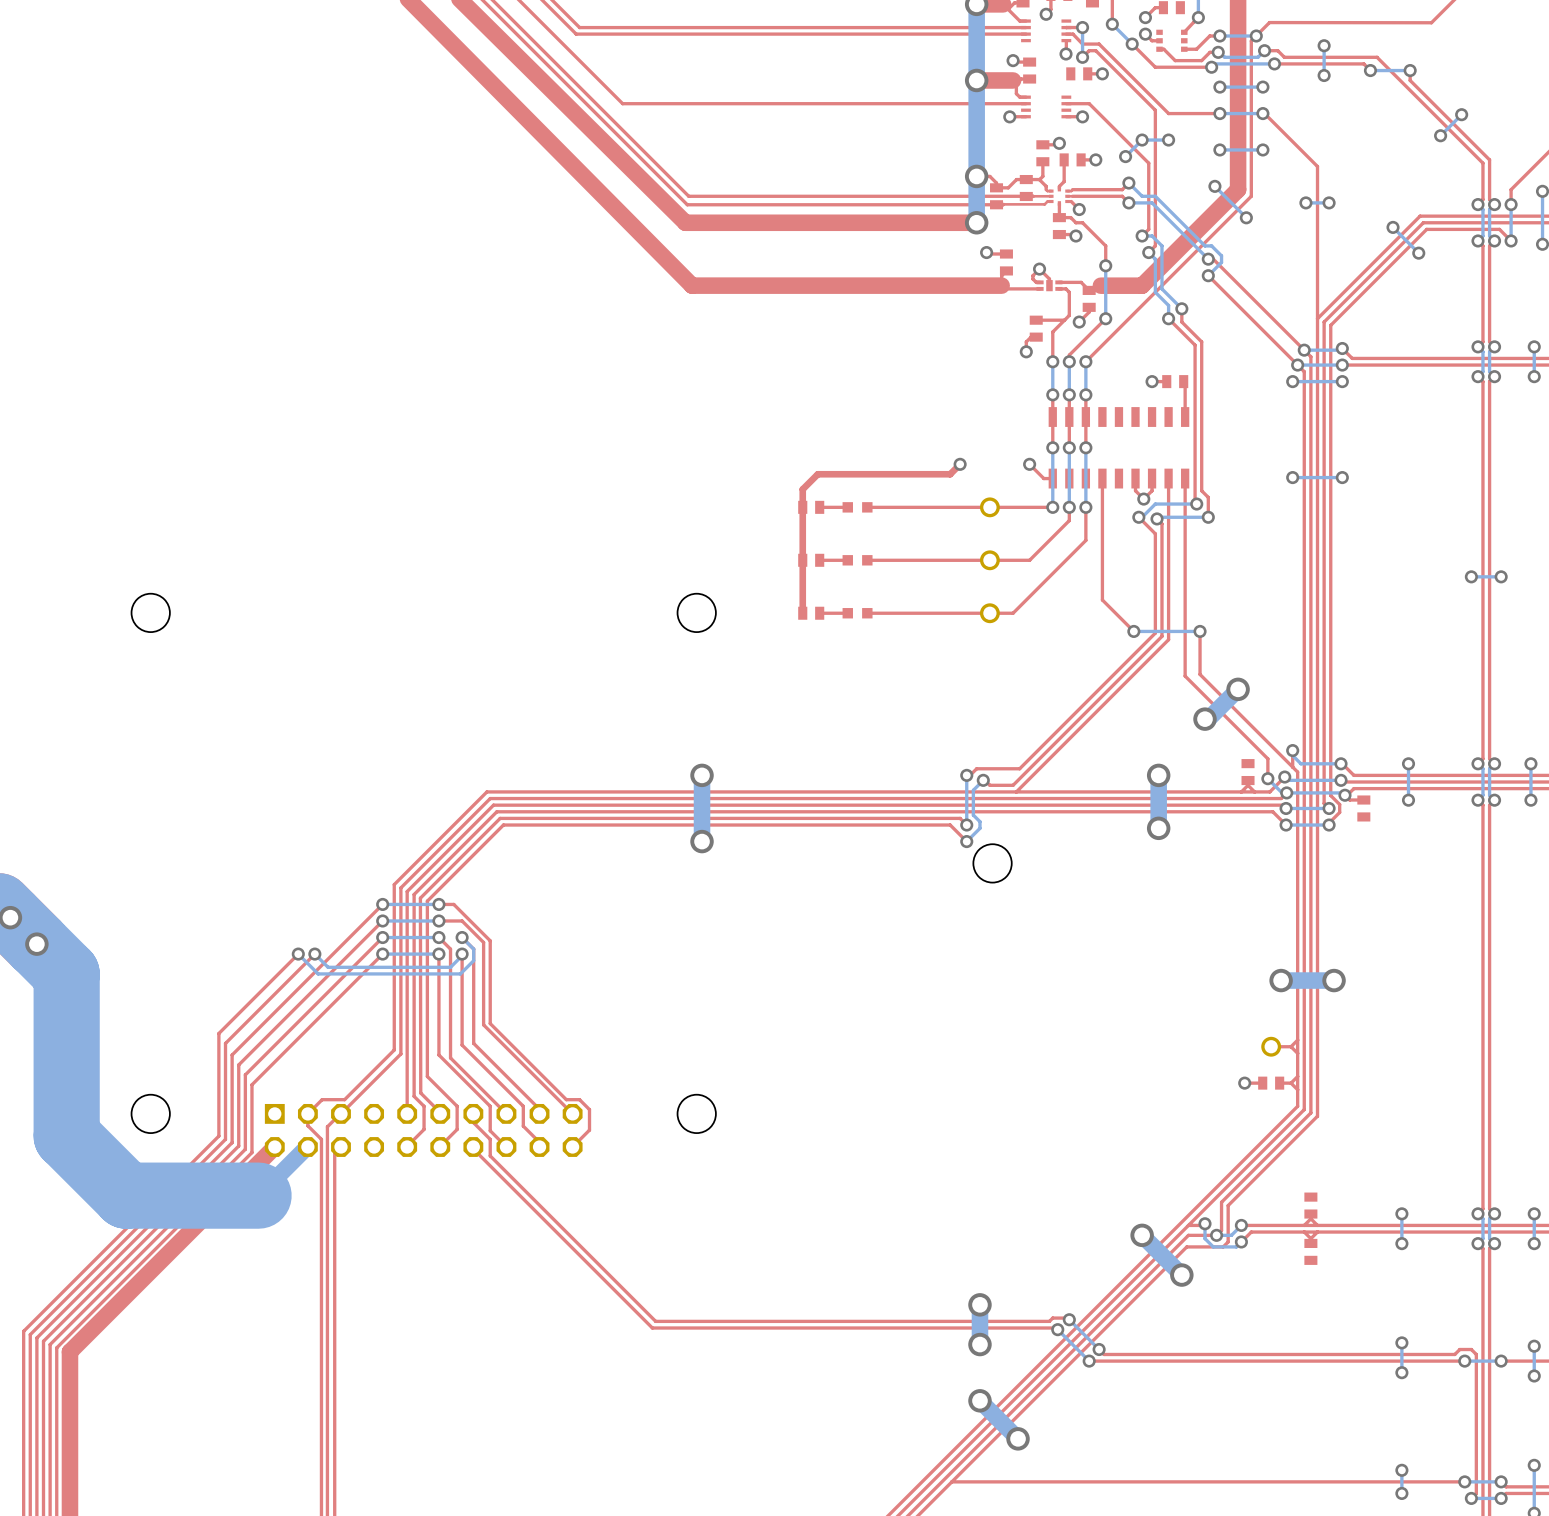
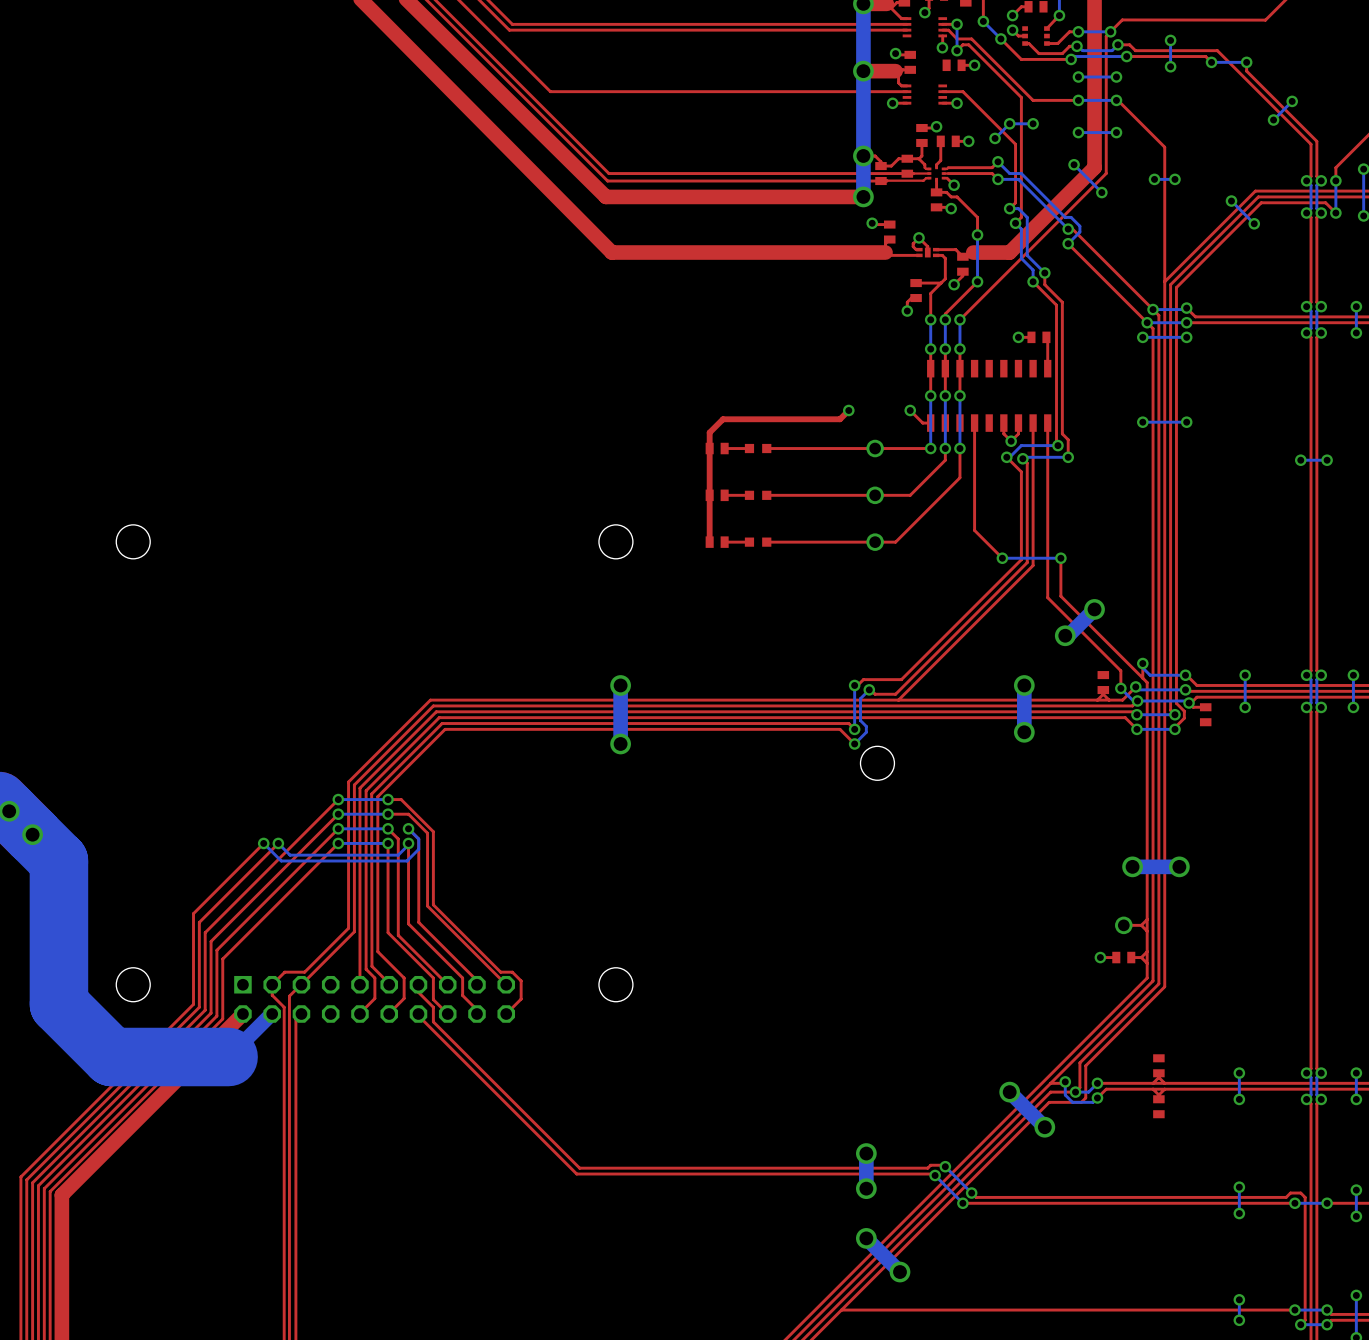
via: none -> (1300, 460)
via: none -> (1327, 460)
via: (1471, 576) -> none
bottom track: (1501, 576) (1471, 576) -> (1327, 460) (1300, 460)
via: (1501, 576) -> none

